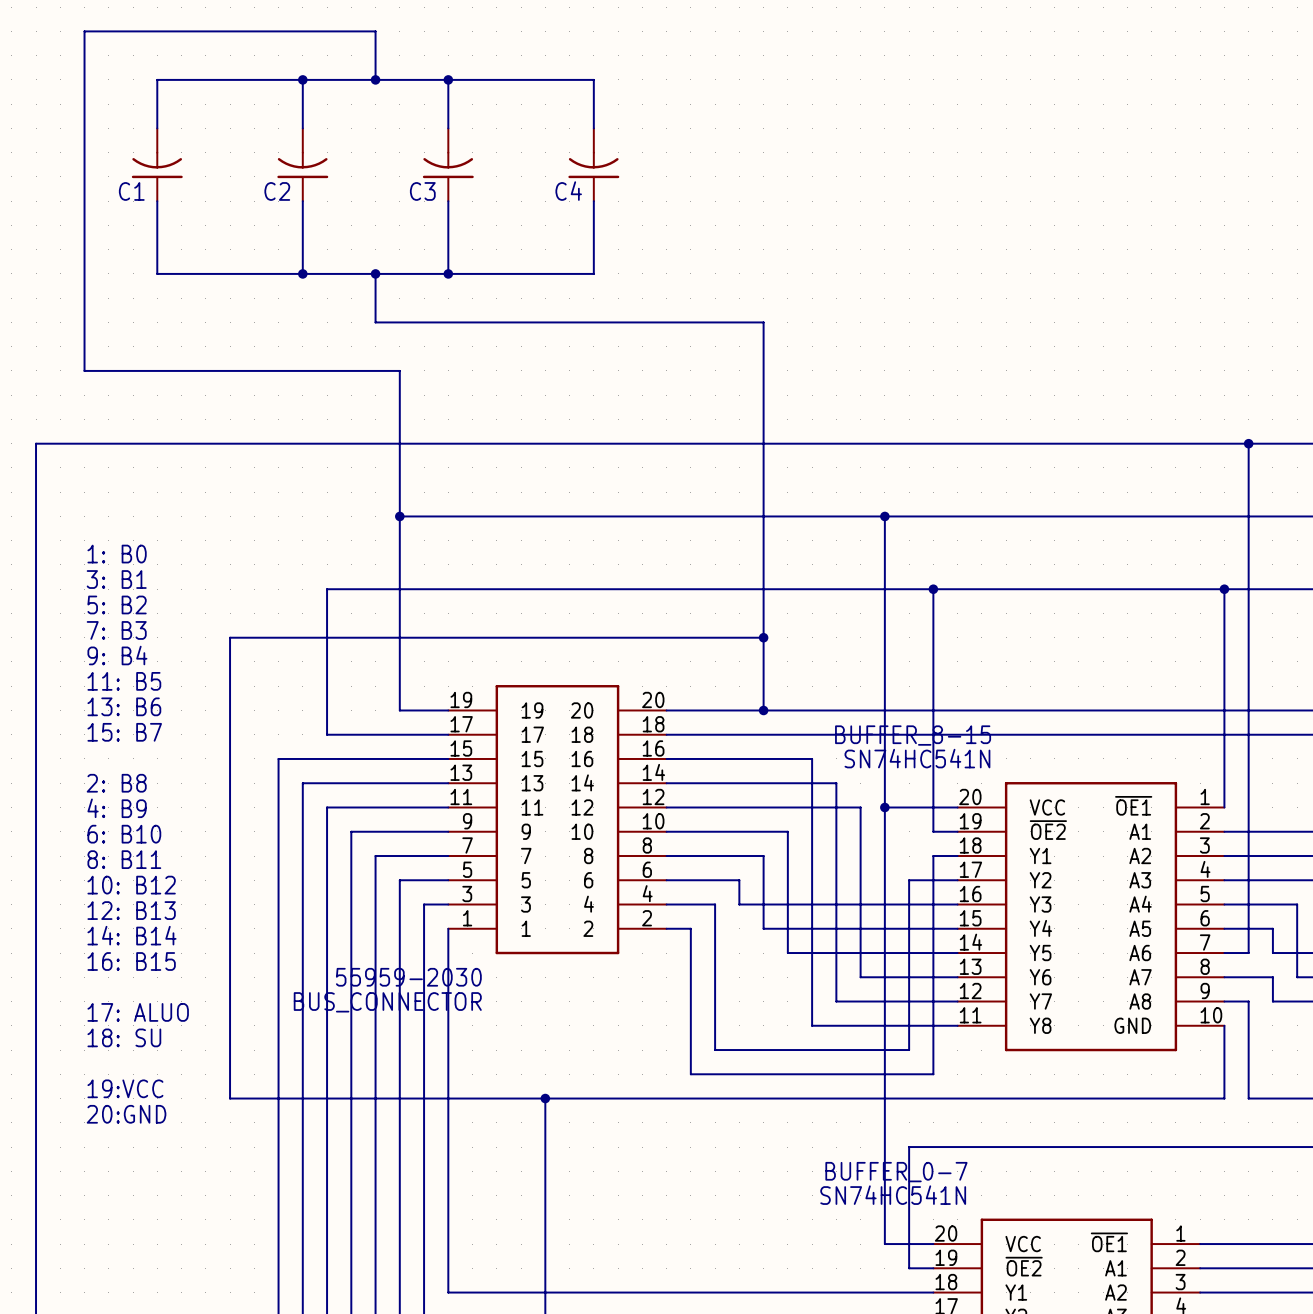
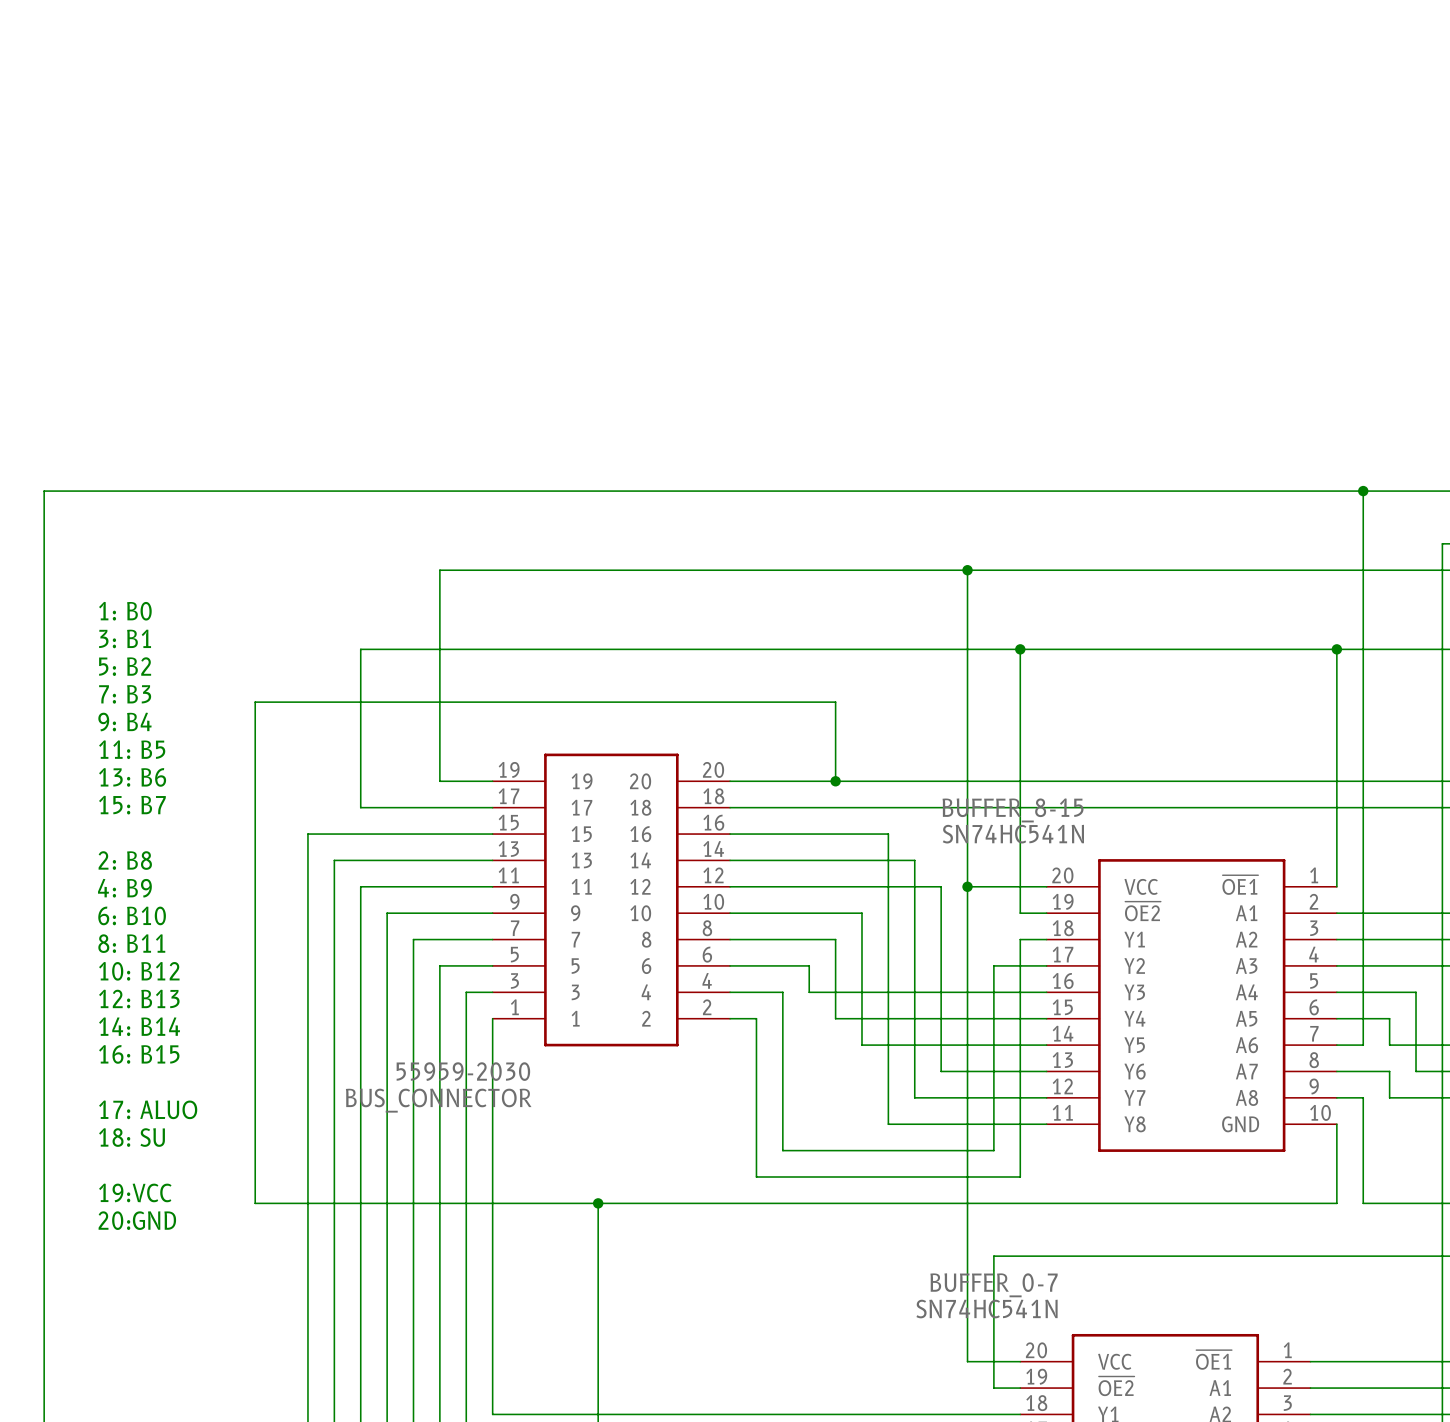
wire: (302, 79) (302, 128) -> none
junction: (302, 79) -> none
wire: (375, 79) (375, 31) (84, 31) (84, 370) (399, 370) (399, 516) -> none
junction: (375, 79) -> none
wire: (448, 79) (448, 128) -> none
junction: (448, 79) -> none
wire: (157, 128) (157, 79) (593, 79) (593, 128) -> none
C1: (157, 164) -> none
C2: (302, 164) -> none
C3: (448, 164) -> none
C4: (593, 164) -> none
wire: (157, 201) (157, 273) (593, 273) (593, 201) -> none
wire: (302, 201) (302, 273) -> none
wire: (448, 201) (448, 273) -> none
junction: (302, 273) -> none
wire: (375, 273) (375, 322) (763, 322) (763, 637) -> none
junction: (375, 273) -> none
junction: (448, 273) -> none
junction: (399, 516) -> none
junction: (763, 637) -> none

